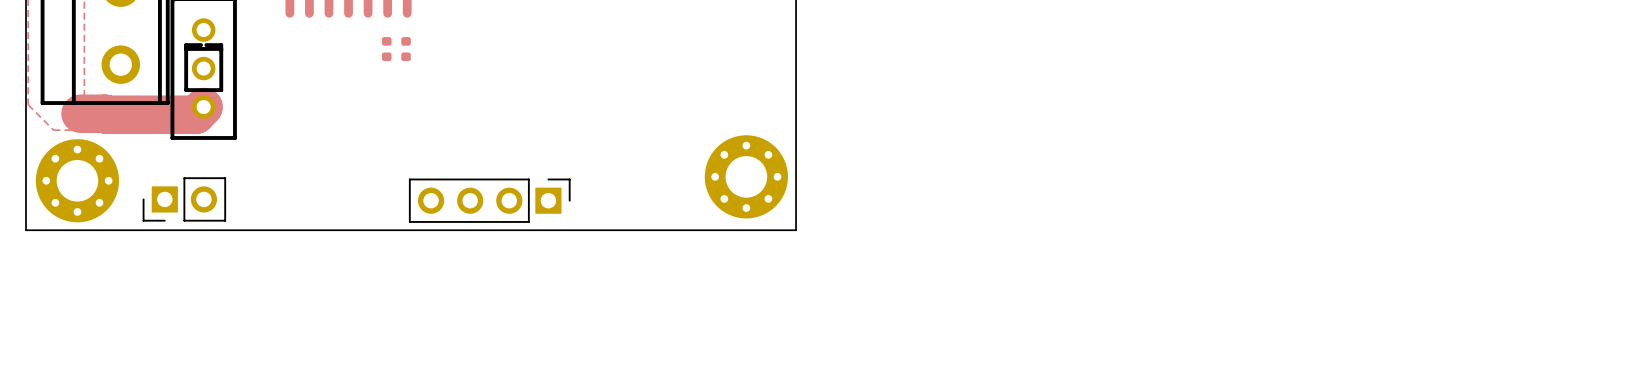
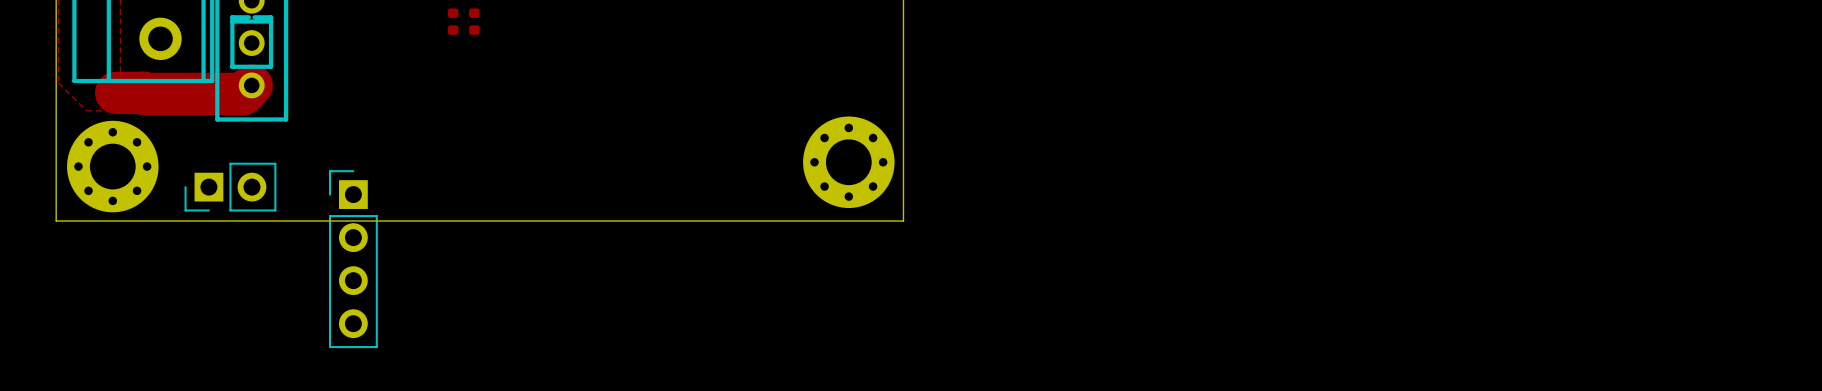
part rotation: 0° (489, 200) -> 90° counterclockwise (353, 259)
part position: (489, 200) -> (353, 259)

